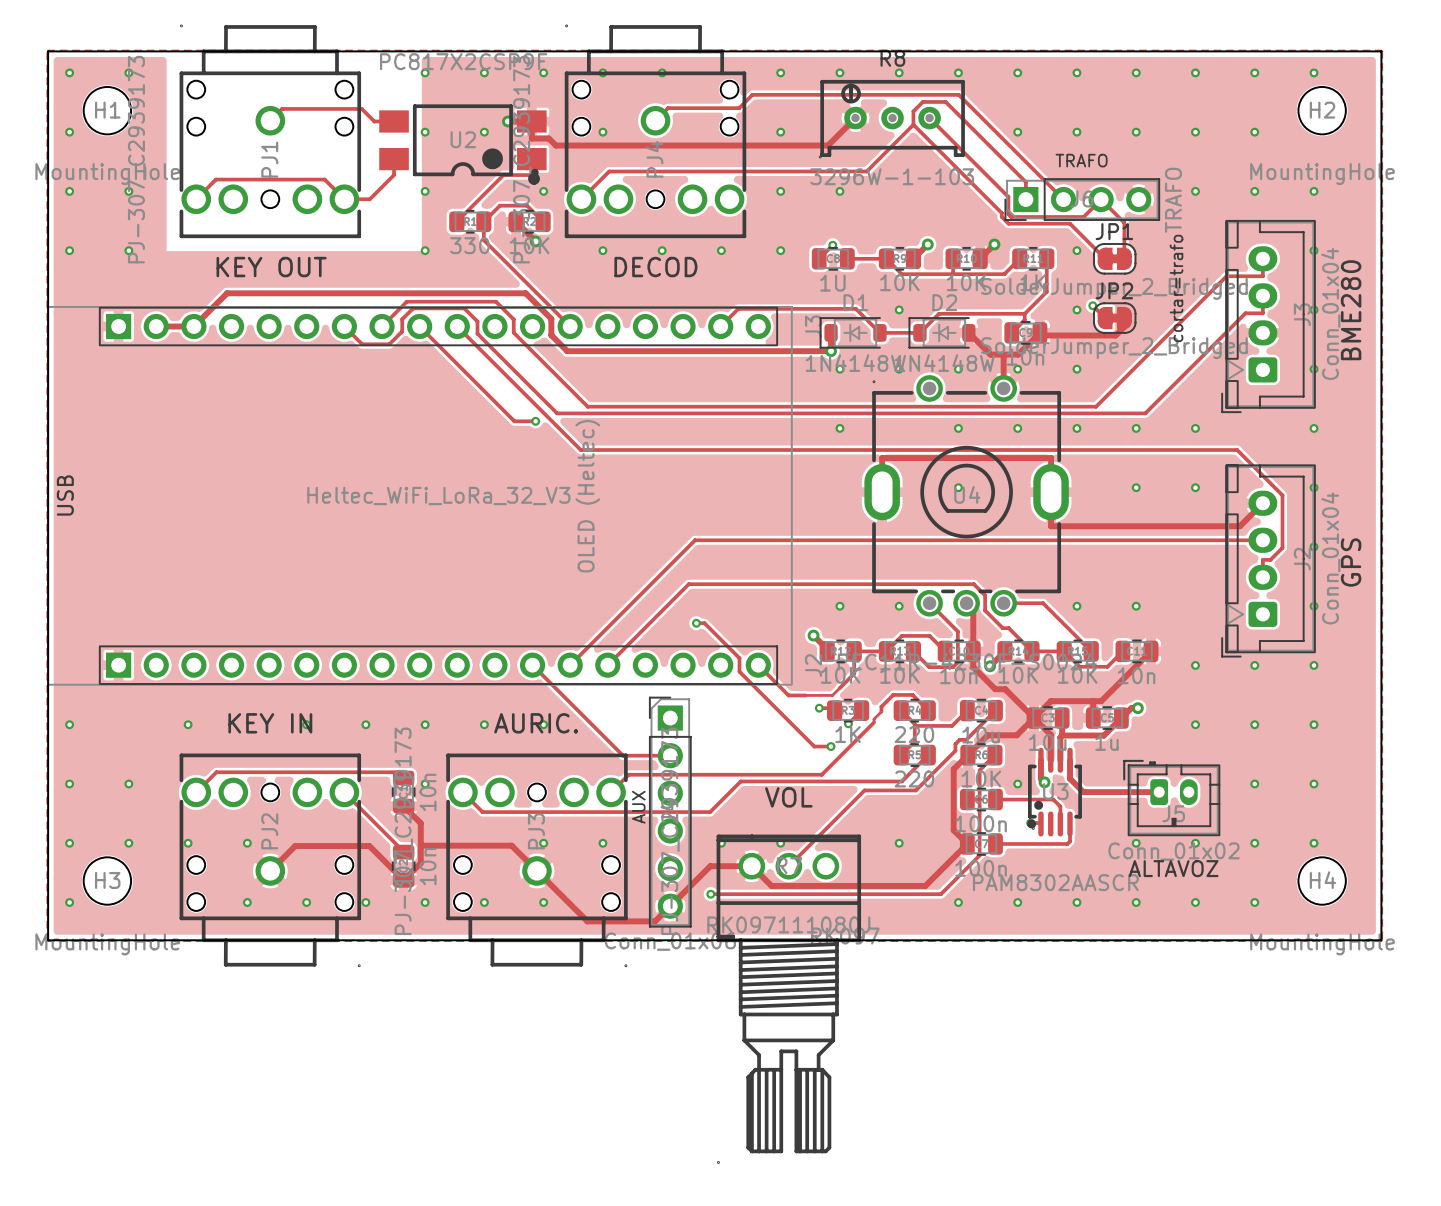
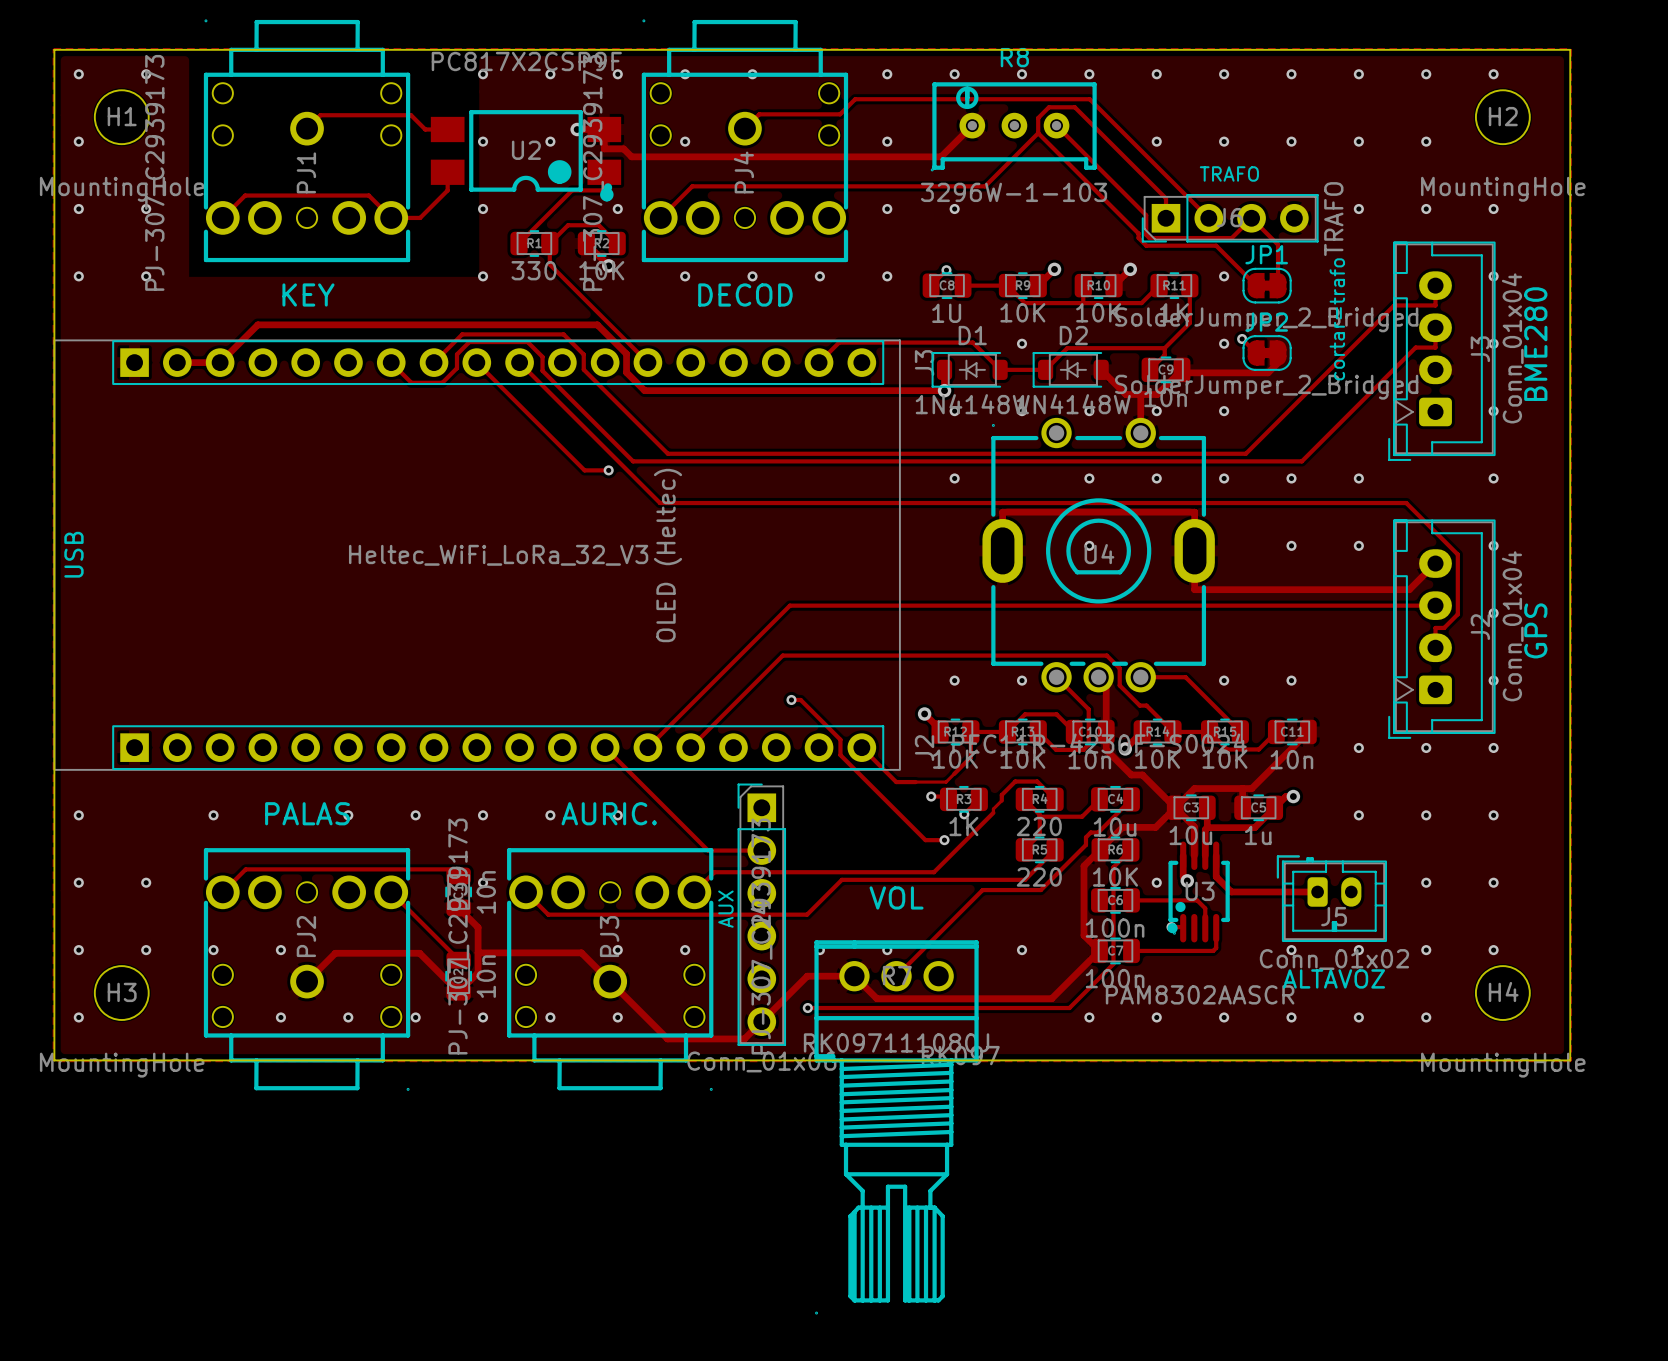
text: KEY OUT (271, 267) -> KEY (308, 294)
text: KEY IN (270, 723) -> PALAS (307, 813)

